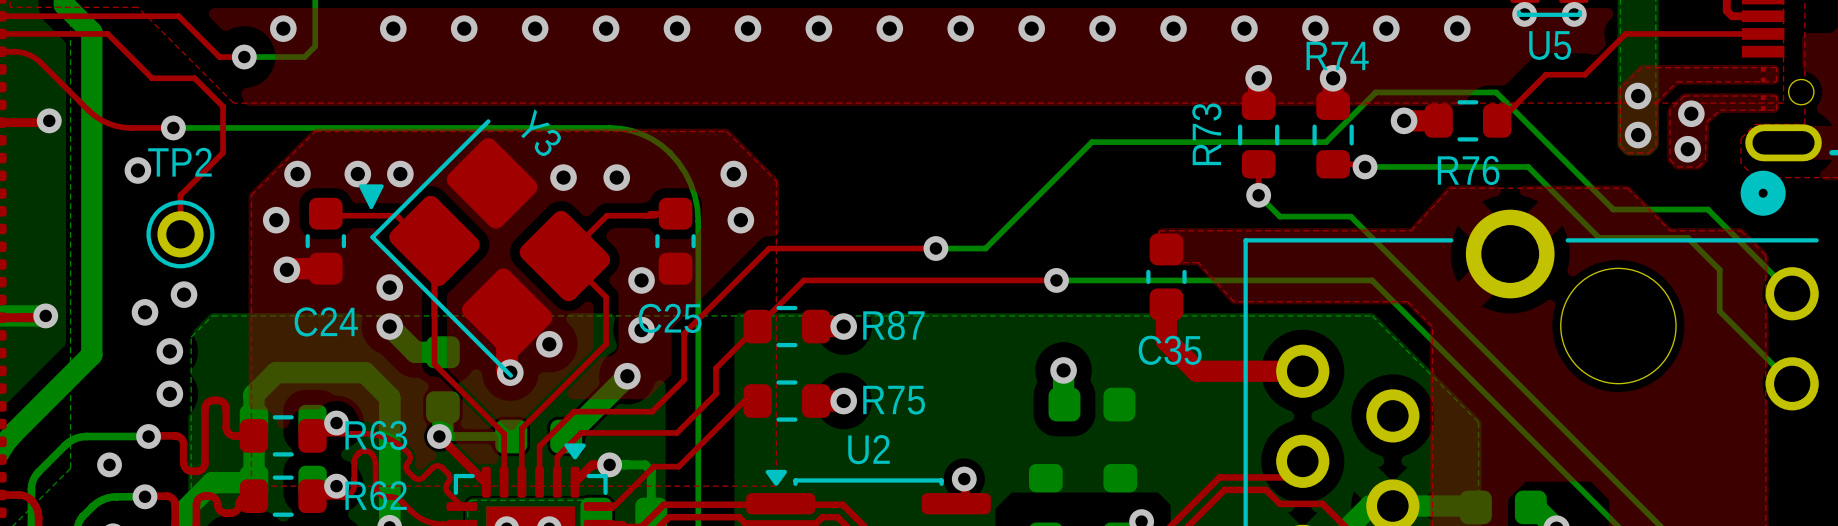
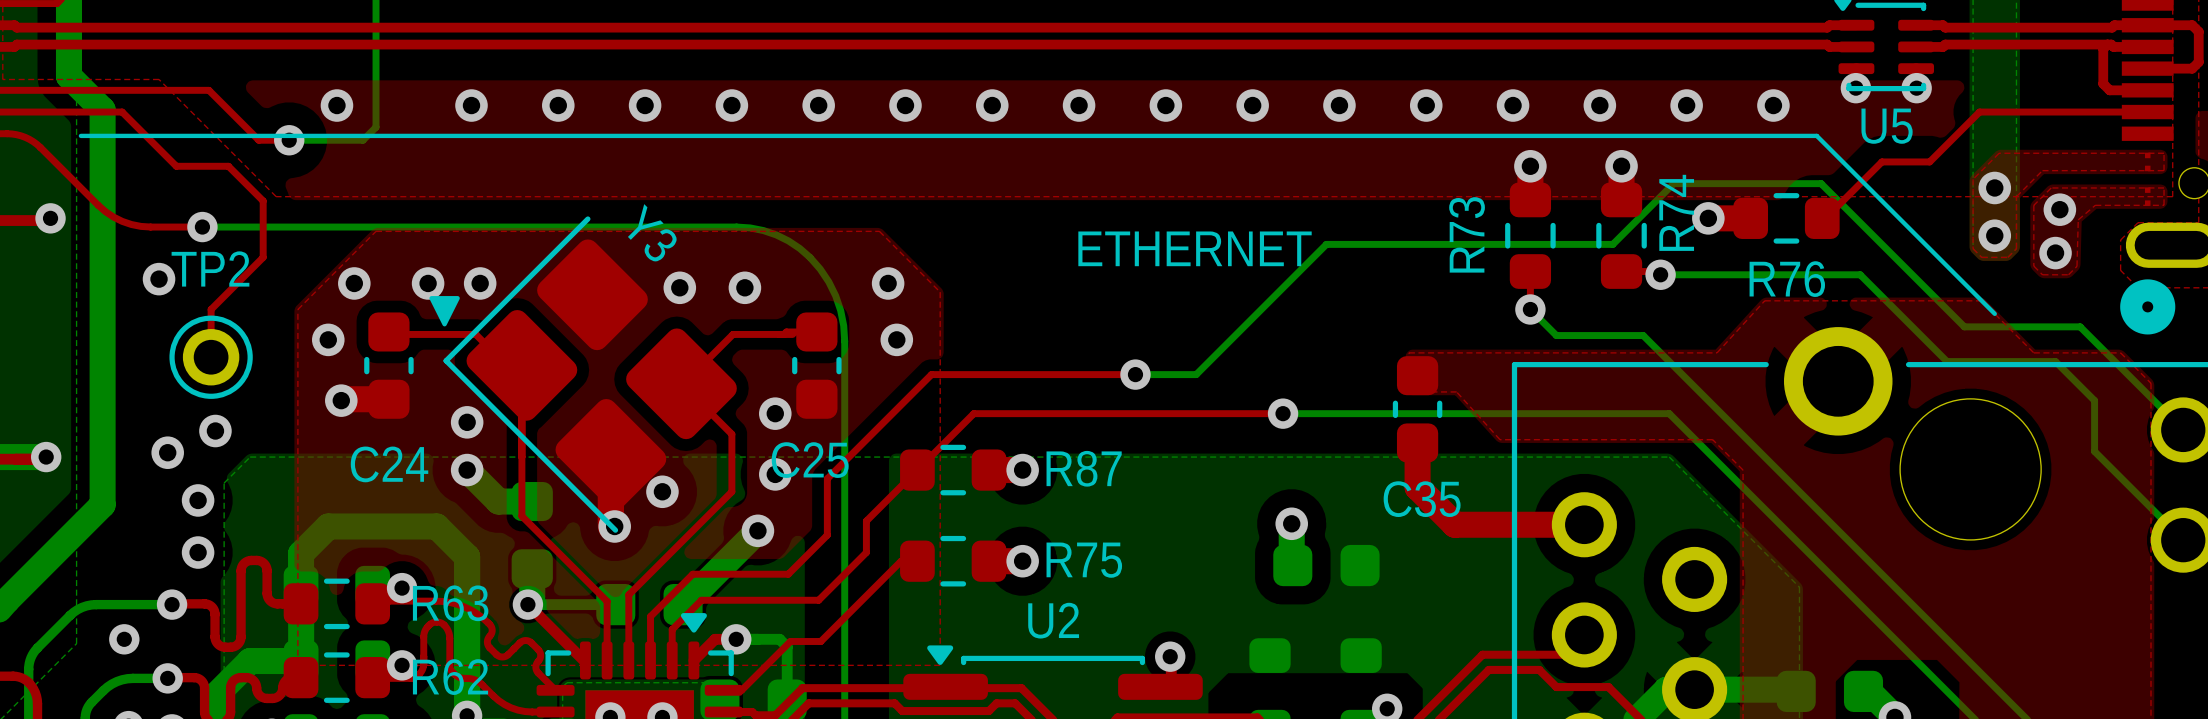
line: none -> (80, 135) (1816, 135) (1994, 313)
R74 name rotation: 0° (1337, 55) -> 90° counterclockwise (1676, 212)
text: none -> ETHERNET (1195, 248)

